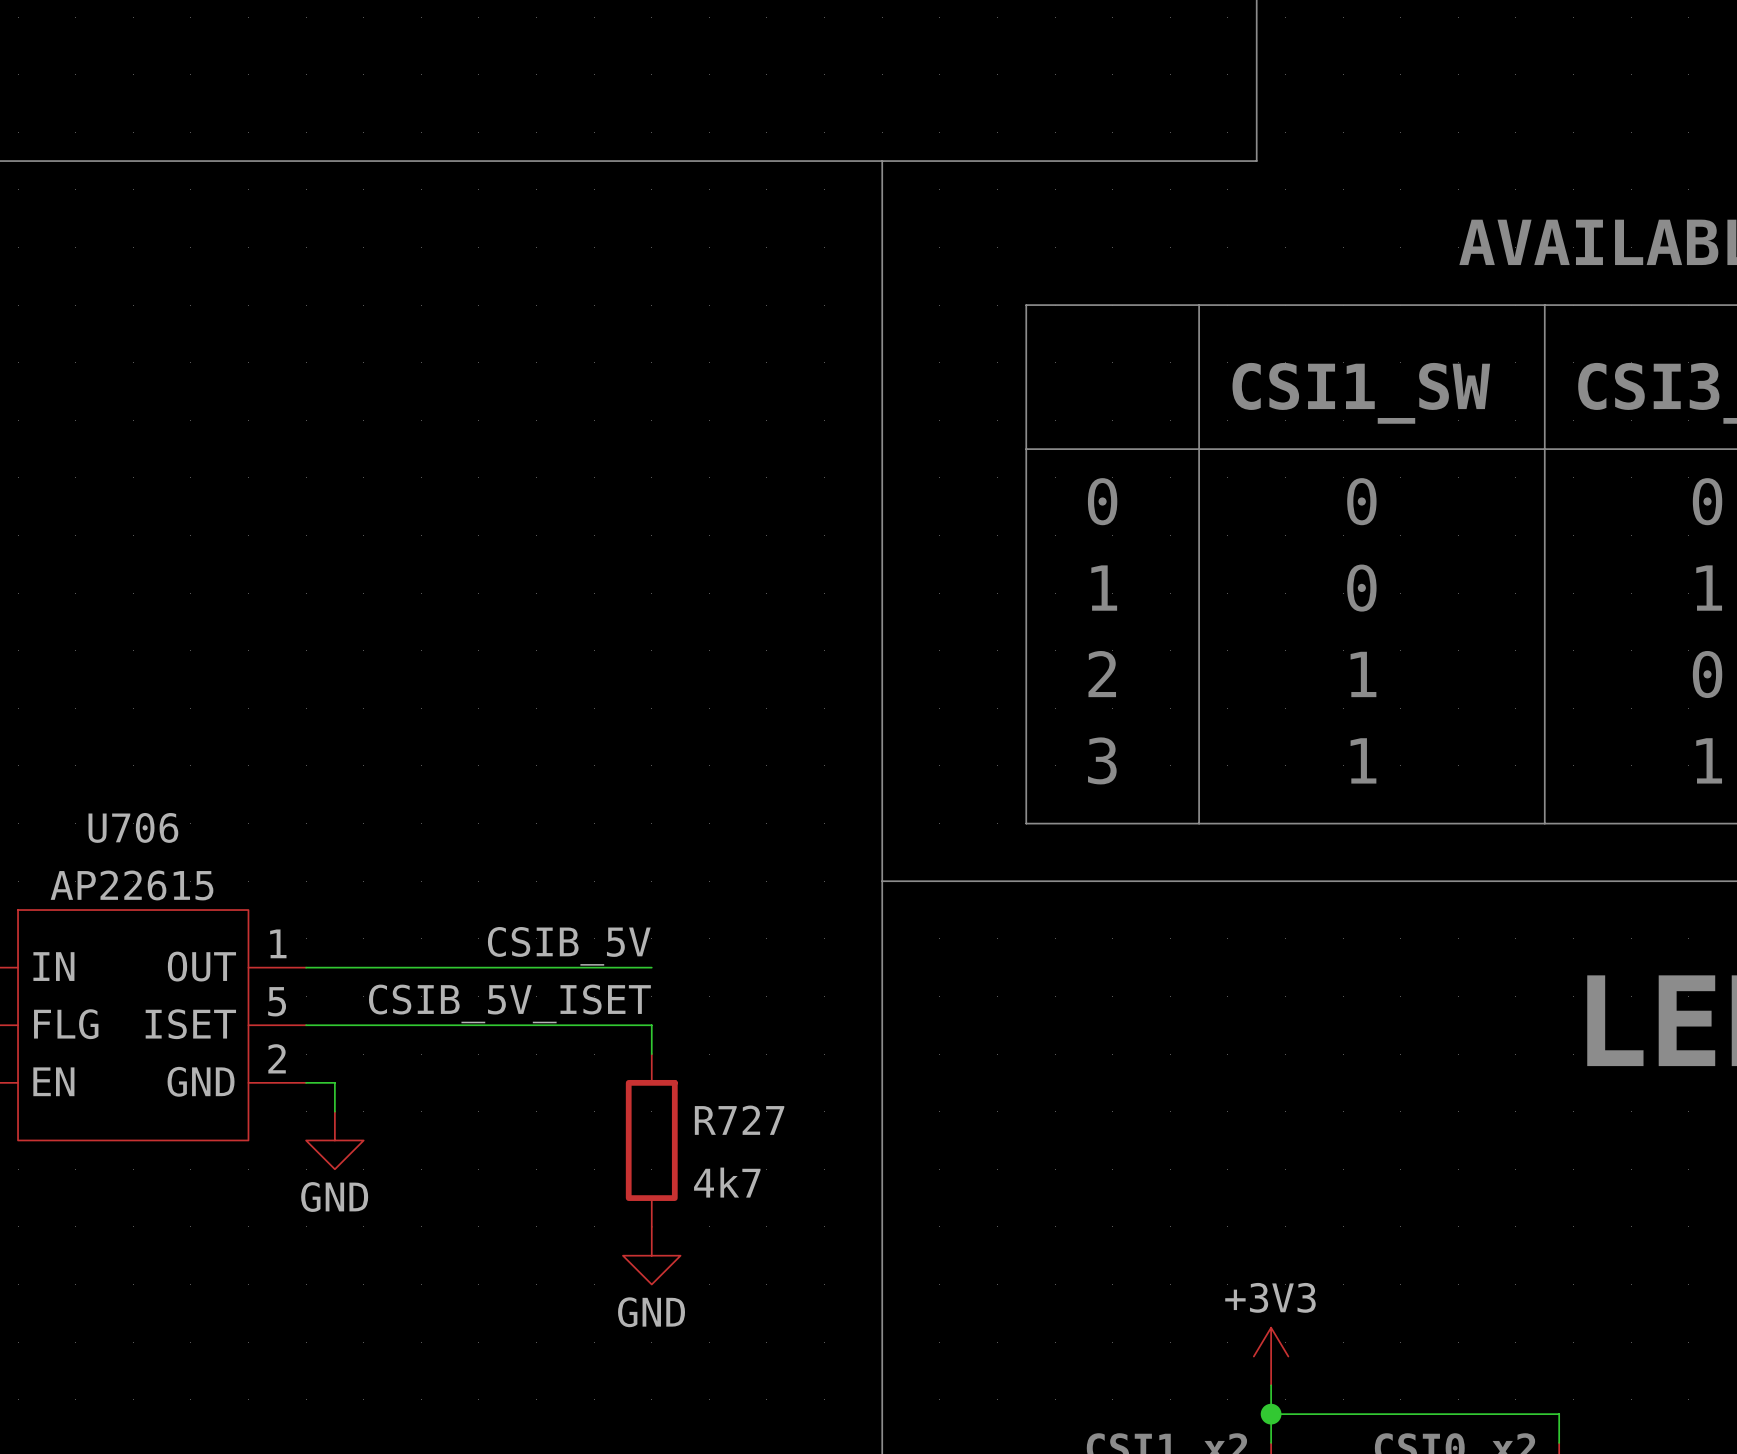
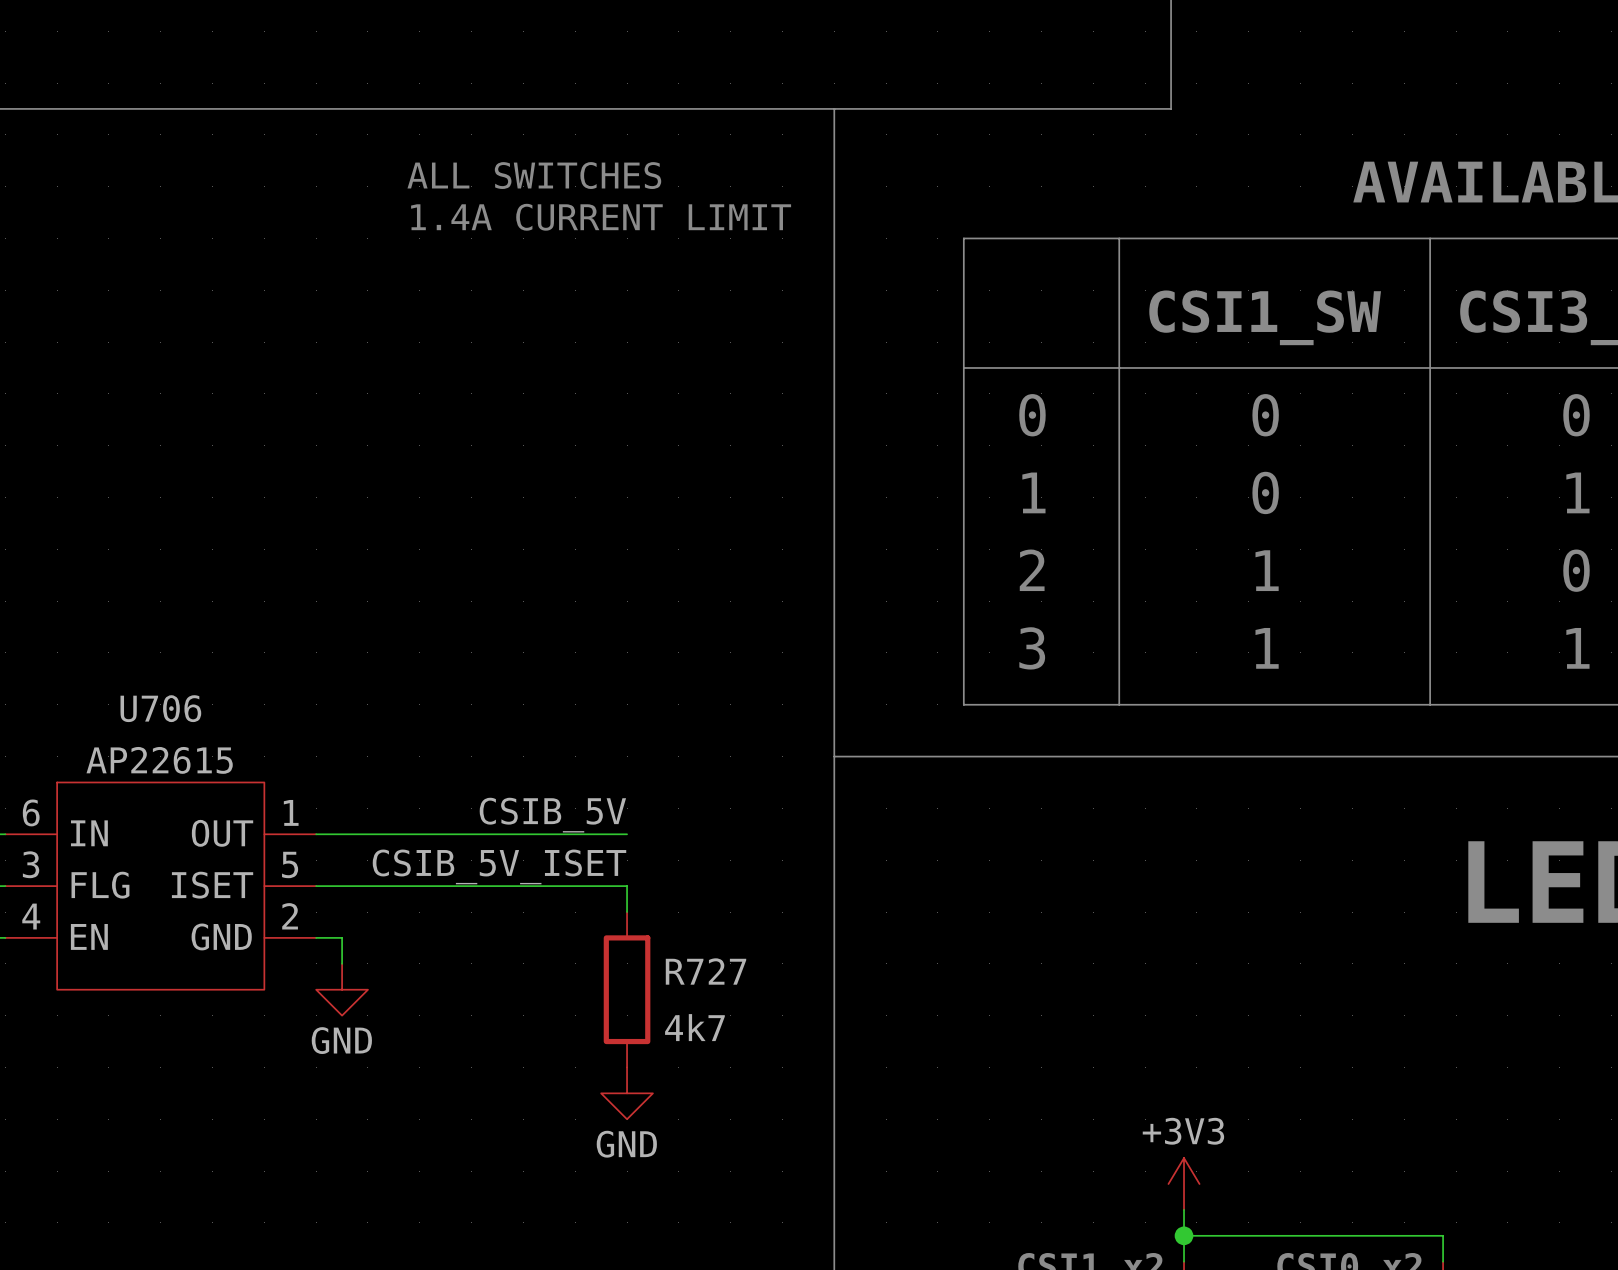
text: none -> ALL SWITCHES (534, 175)
text: none -> 1.4A CURRENT LIMIT (601, 217)

